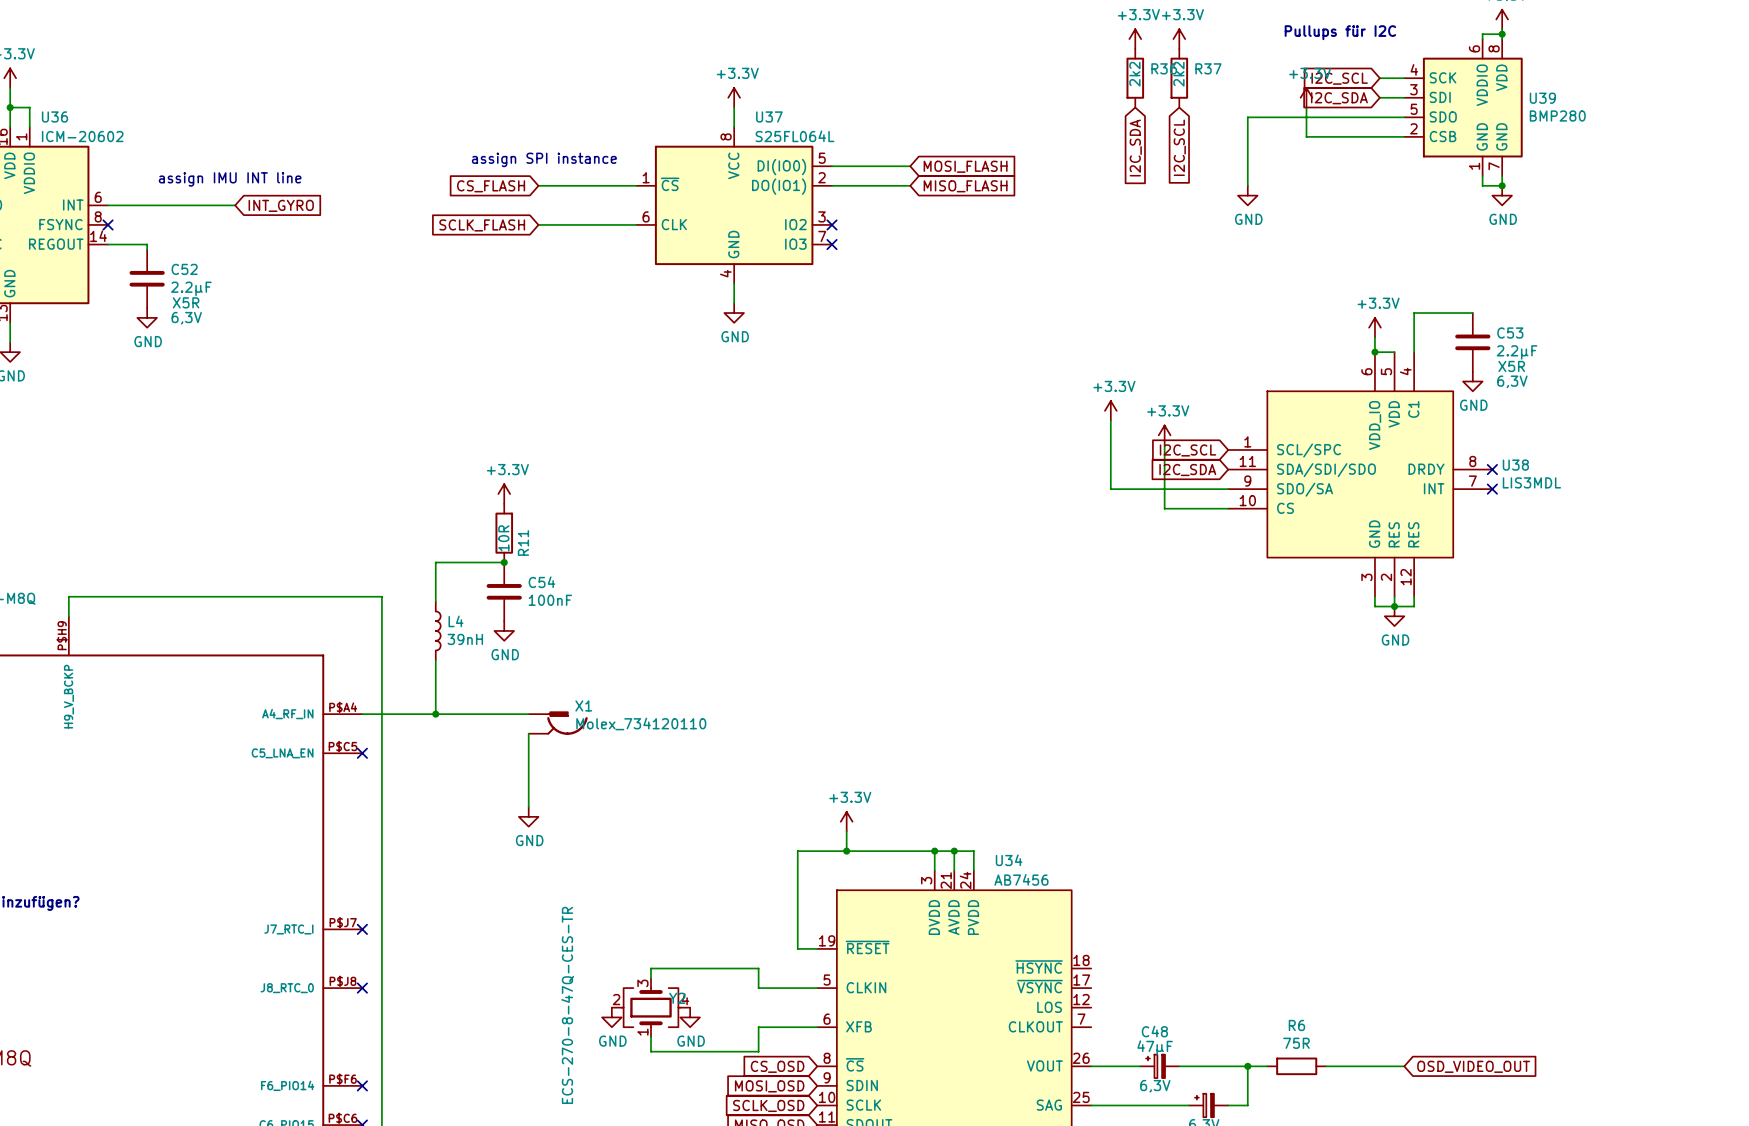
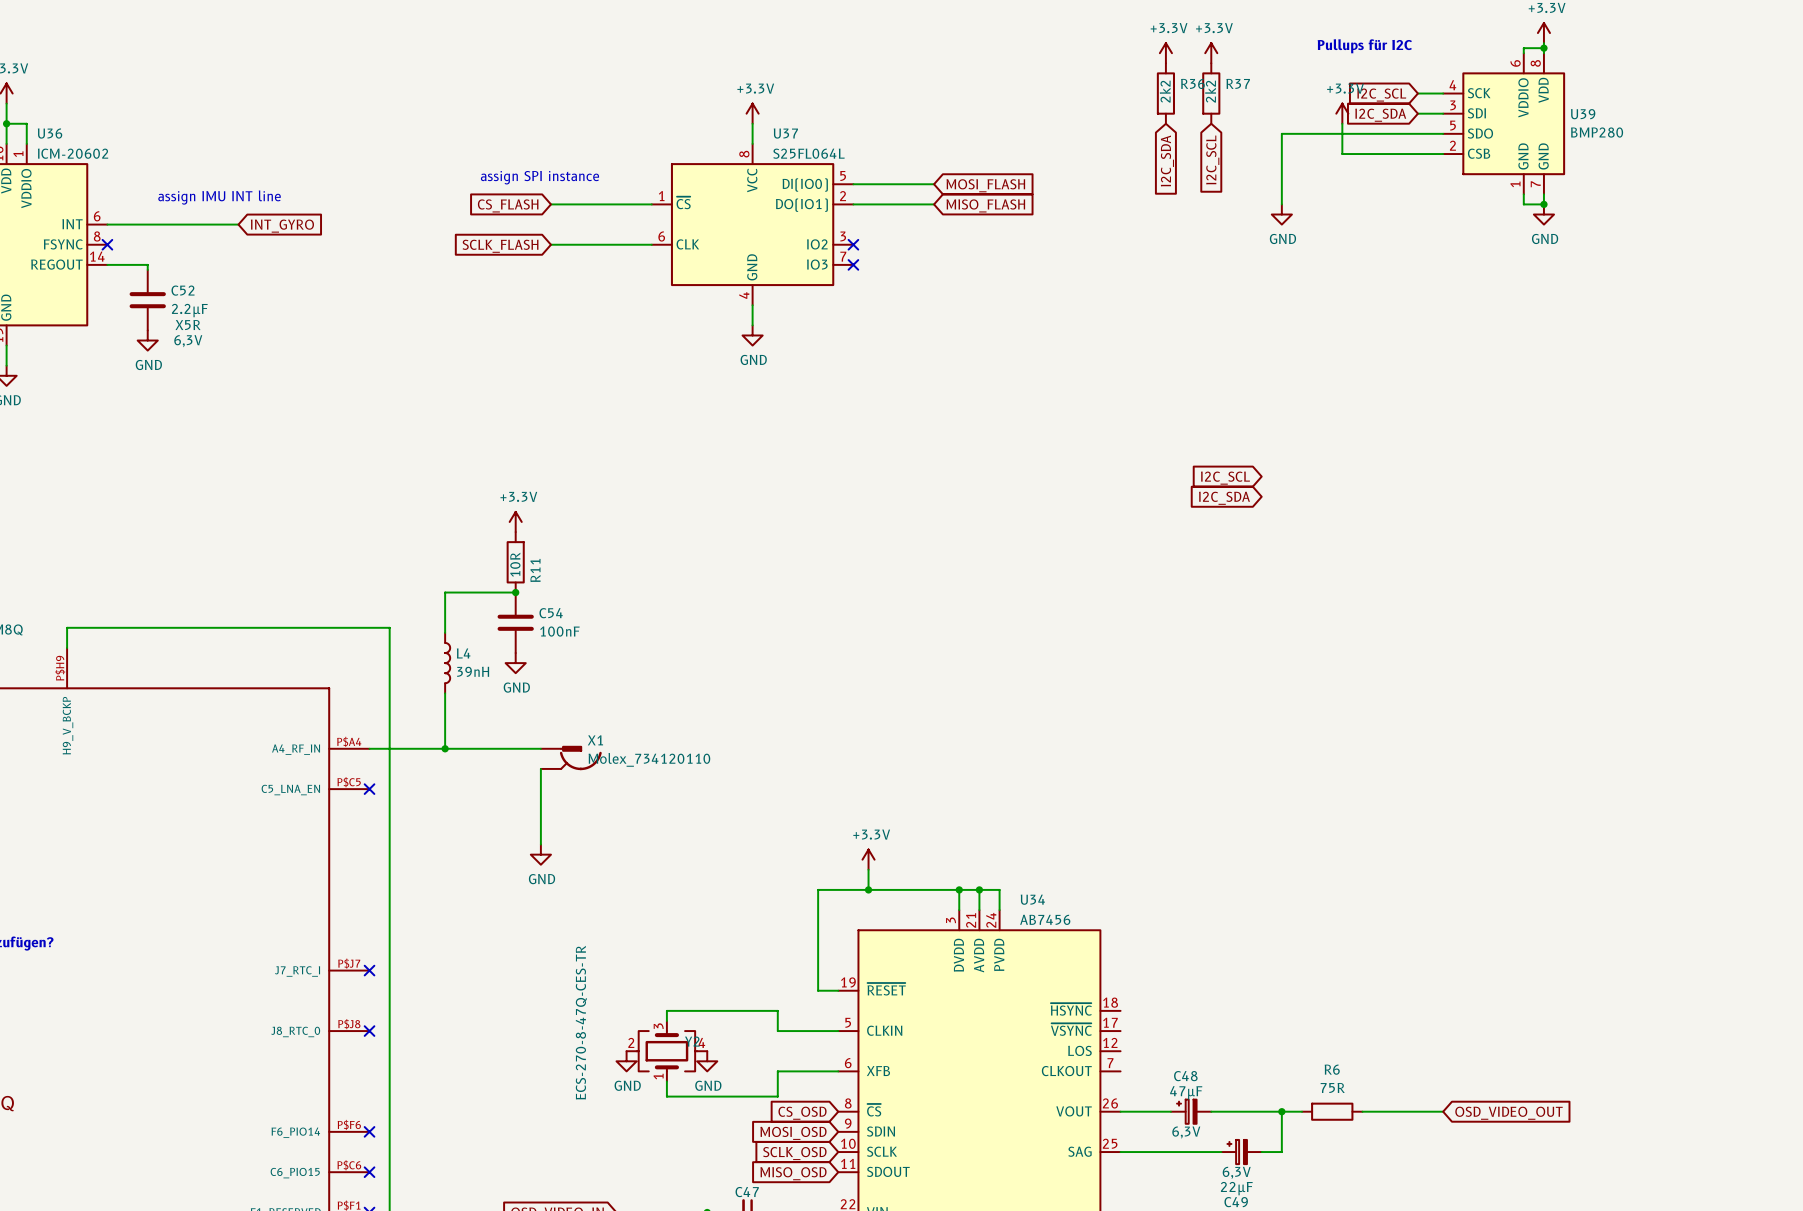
wire: (1472, 313) (1414, 313) (1414, 352) -> none
power symbol: +3.3V (1374, 327) -> none
wire: (1374, 337) (1374, 352) (1394, 352) -> none
C53: 2.2µF (1472, 342) -> none
junction: (1374, 352) -> none
power symbol: GND (1472, 381) -> none
power symbol: +3.3V (1110, 410) -> none
wire: (1110, 420) (1110, 489) (1228, 489) -> none
power symbol: +3.3V (1164, 435) -> none
wire: (1164, 445) (1164, 508) (1228, 508) -> none
no-connect mark: (1492, 469) -> none
U38: LIS3MDL (1360, 474) -> none
no-connect mark: (1492, 489) -> none
wire: (1374, 596) (1374, 606) (1414, 606) (1414, 596) -> none
wire: (1394, 596) (1394, 606) -> none
junction: (1394, 606) -> none
power symbol: GND (1394, 616) -> none

